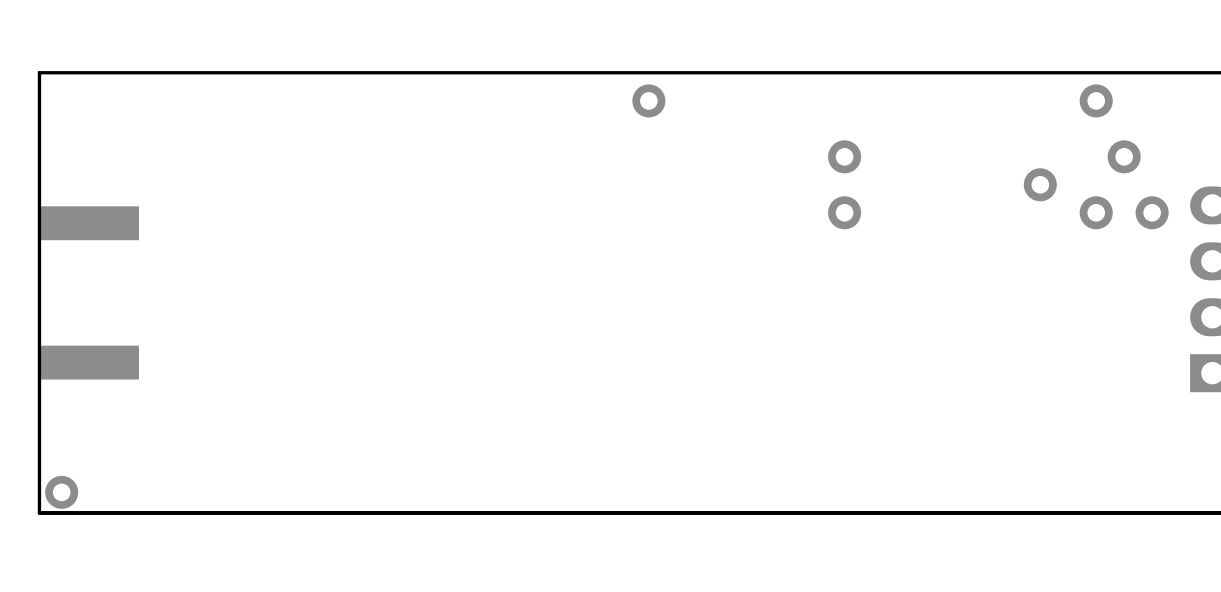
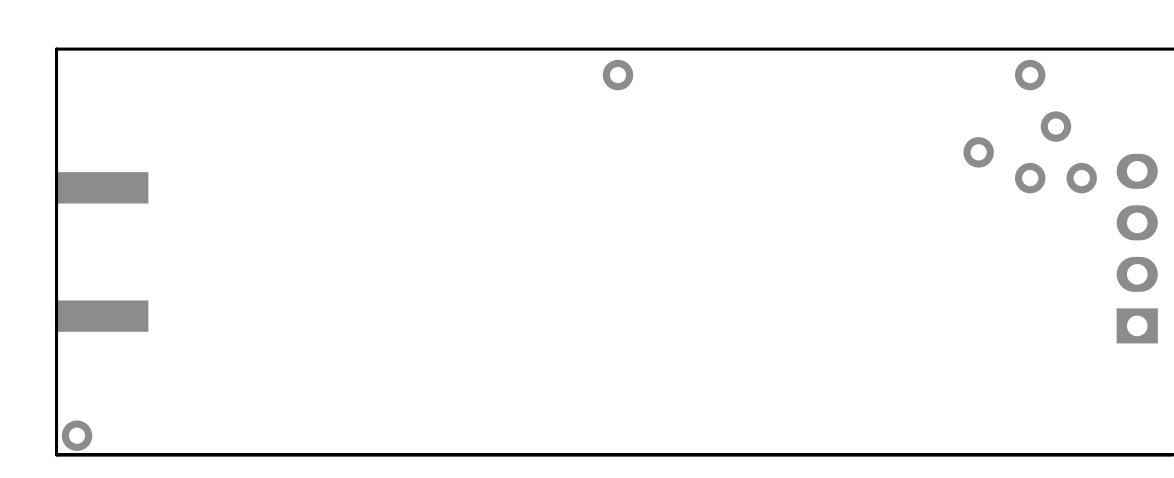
part: (844, 156) -> none
part: (844, 212) -> none

